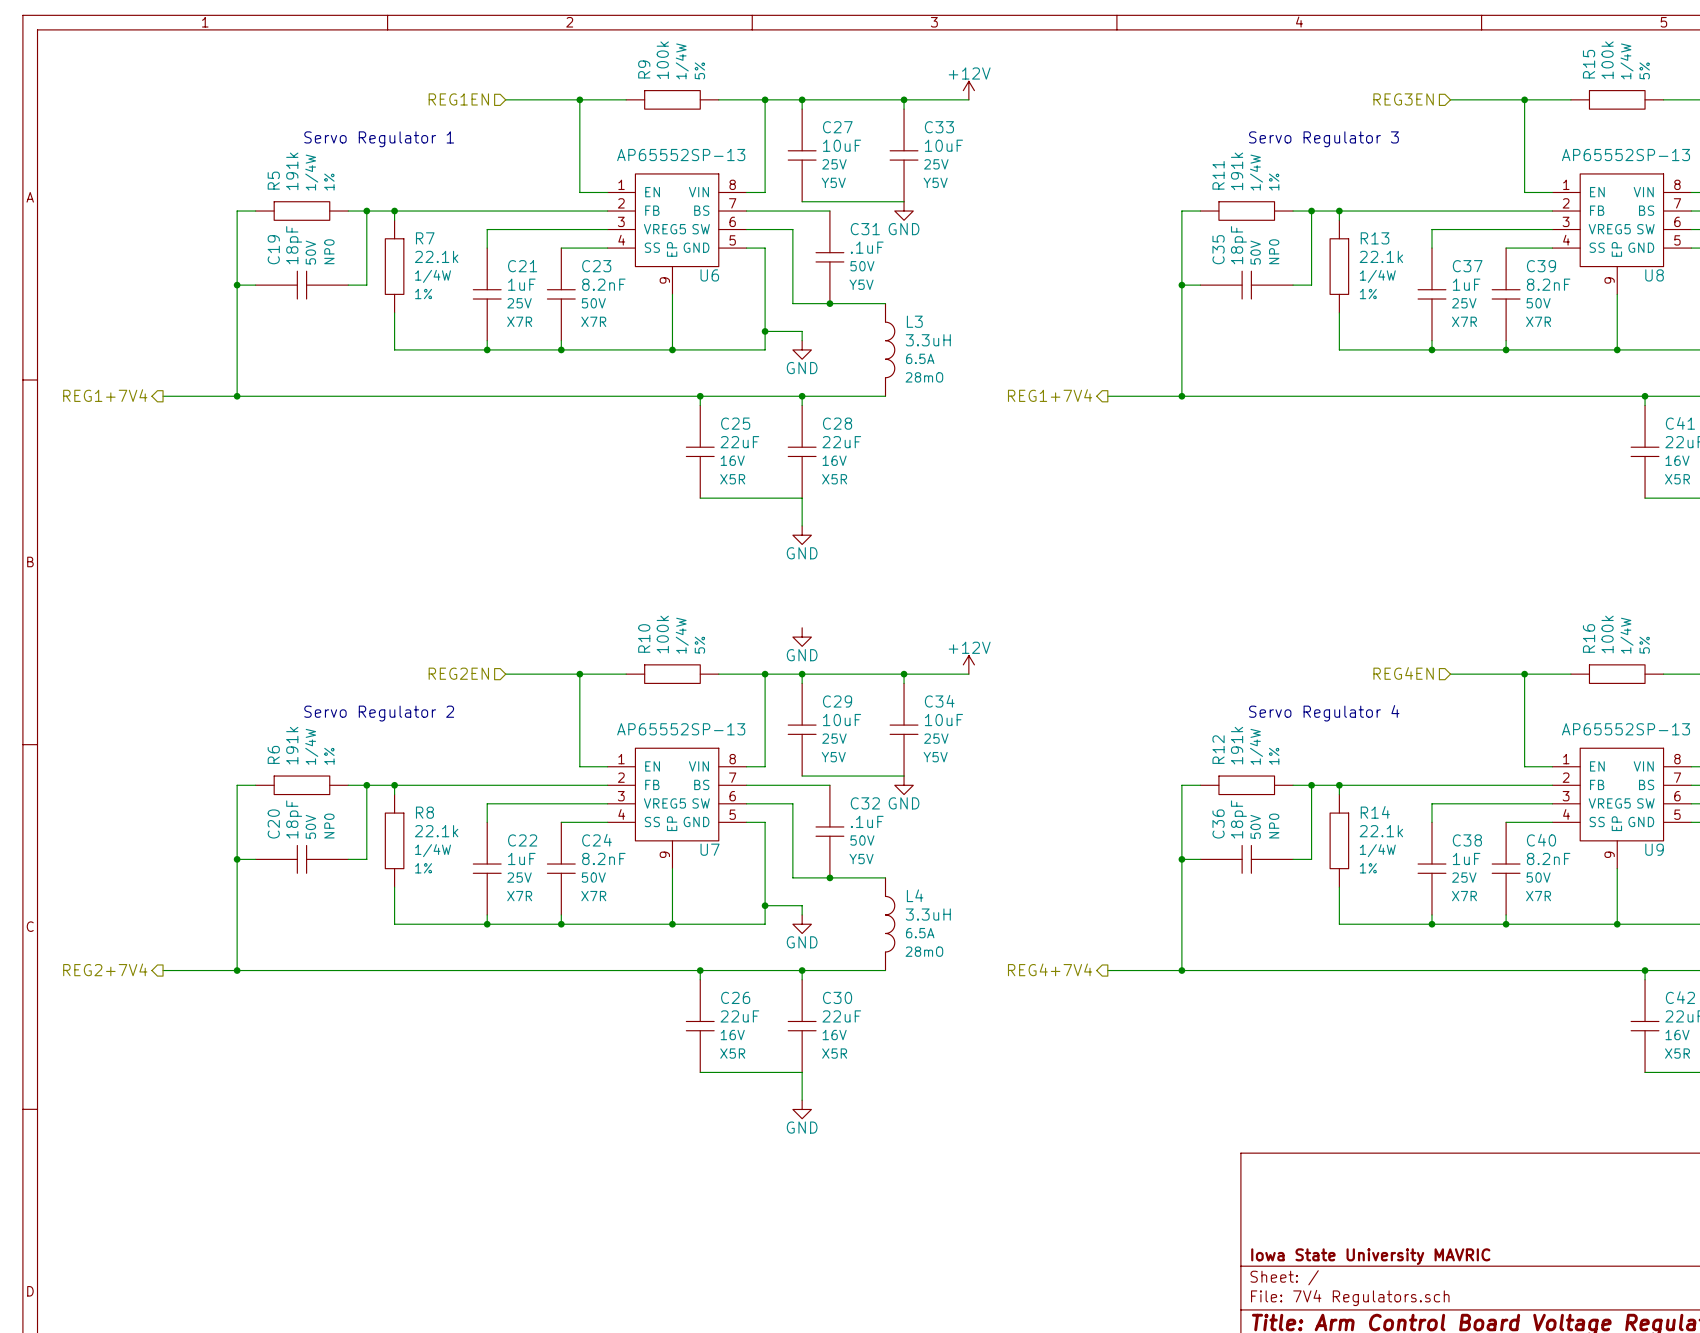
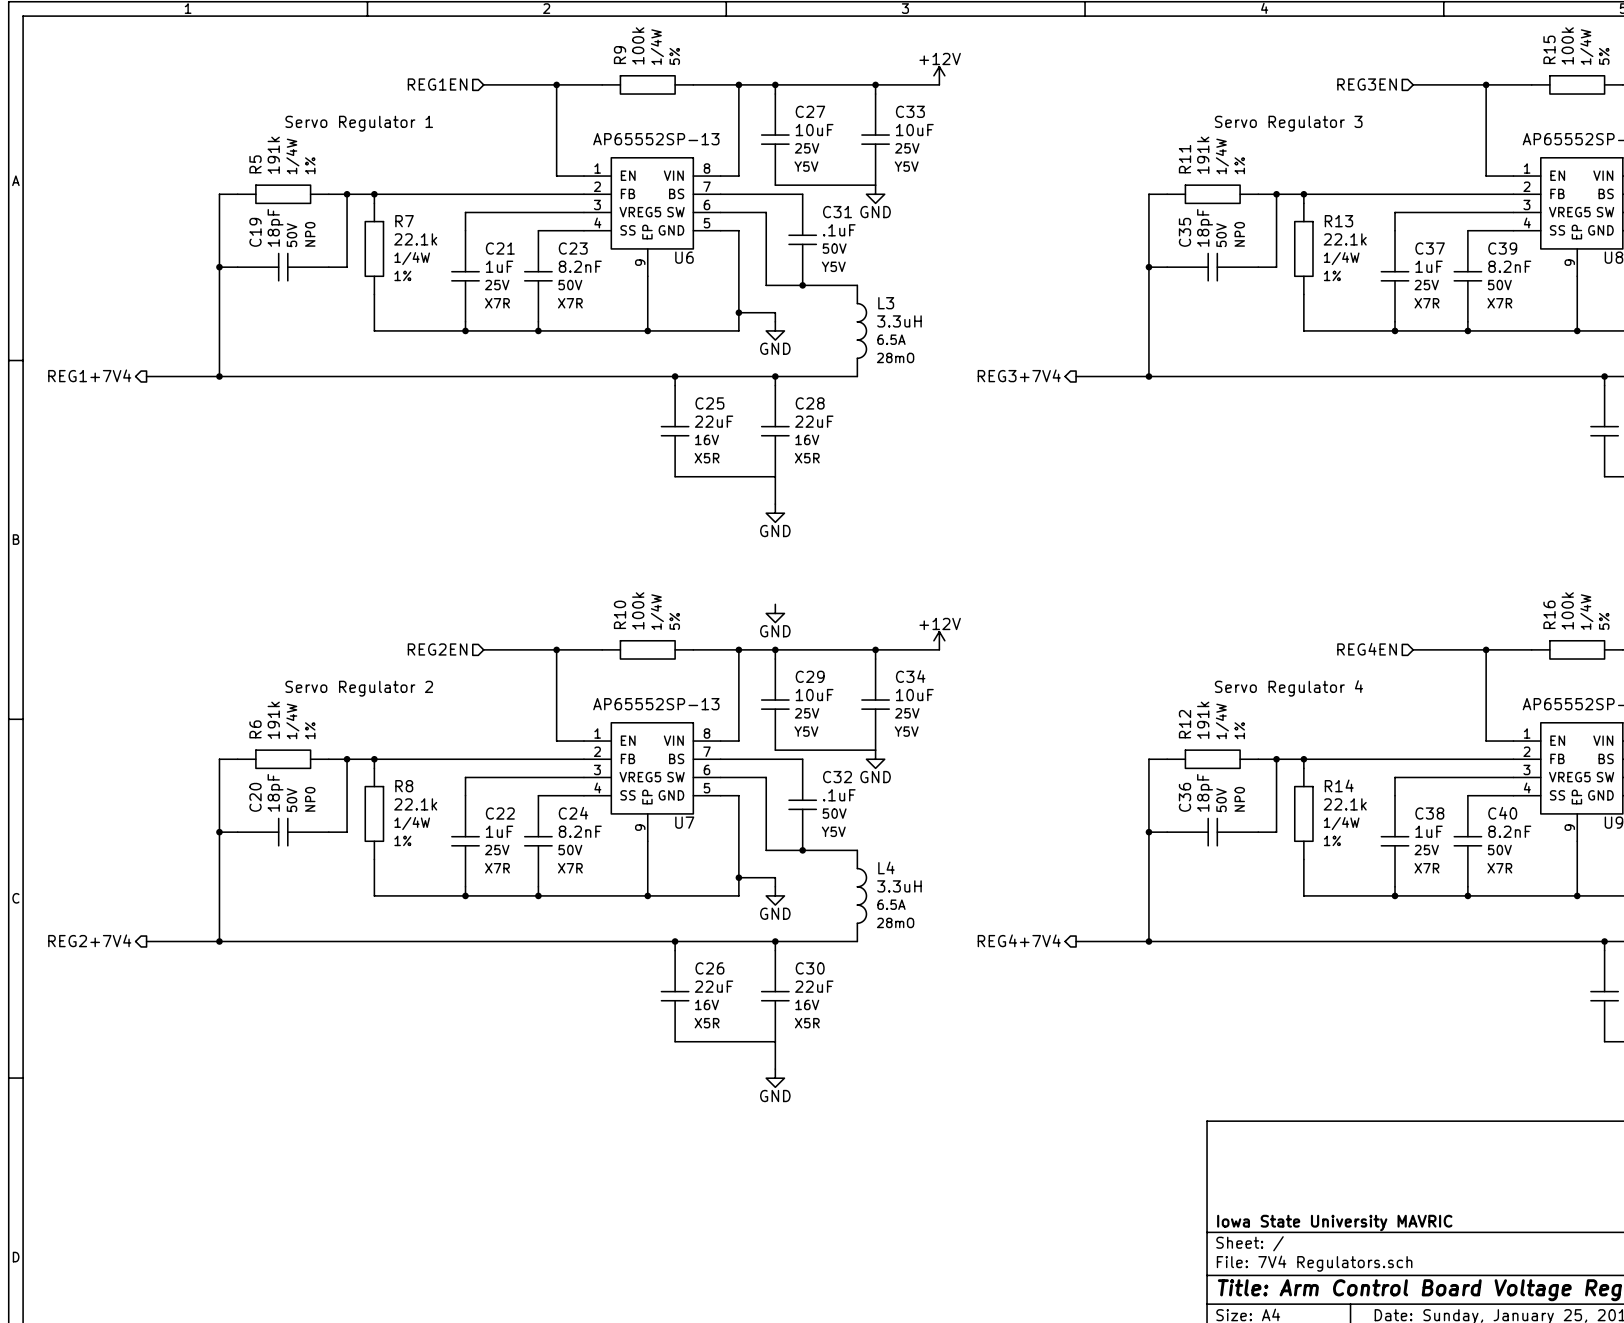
hierarchical label: REG1+7V4 (1050, 395) -> REG3+7V4 (1019, 375)

